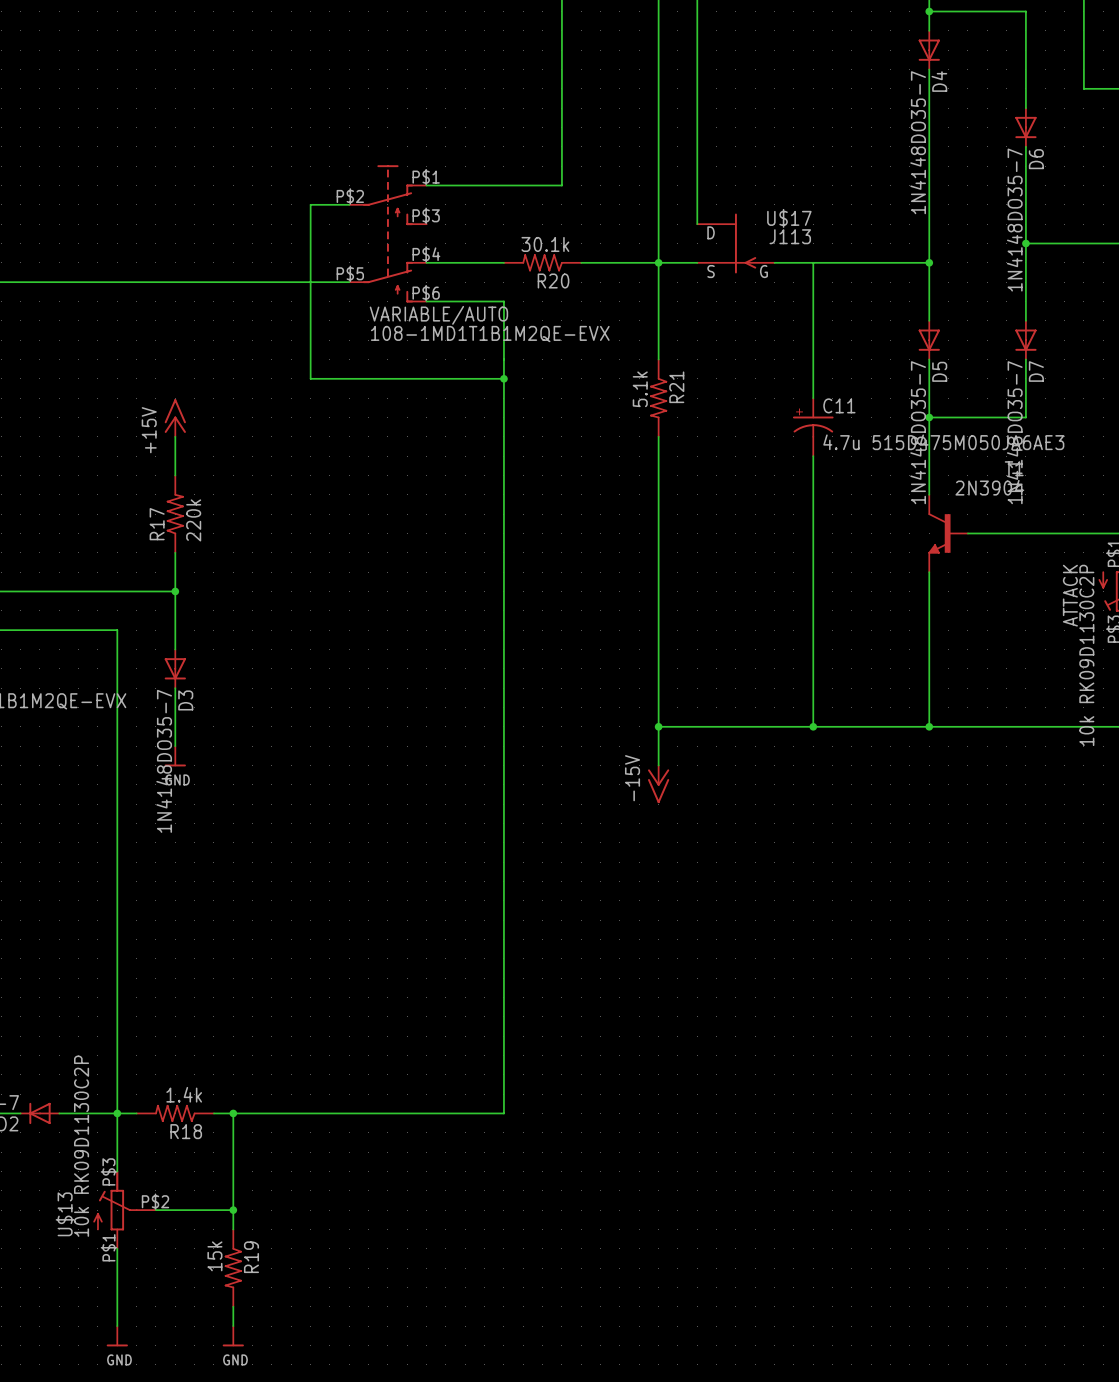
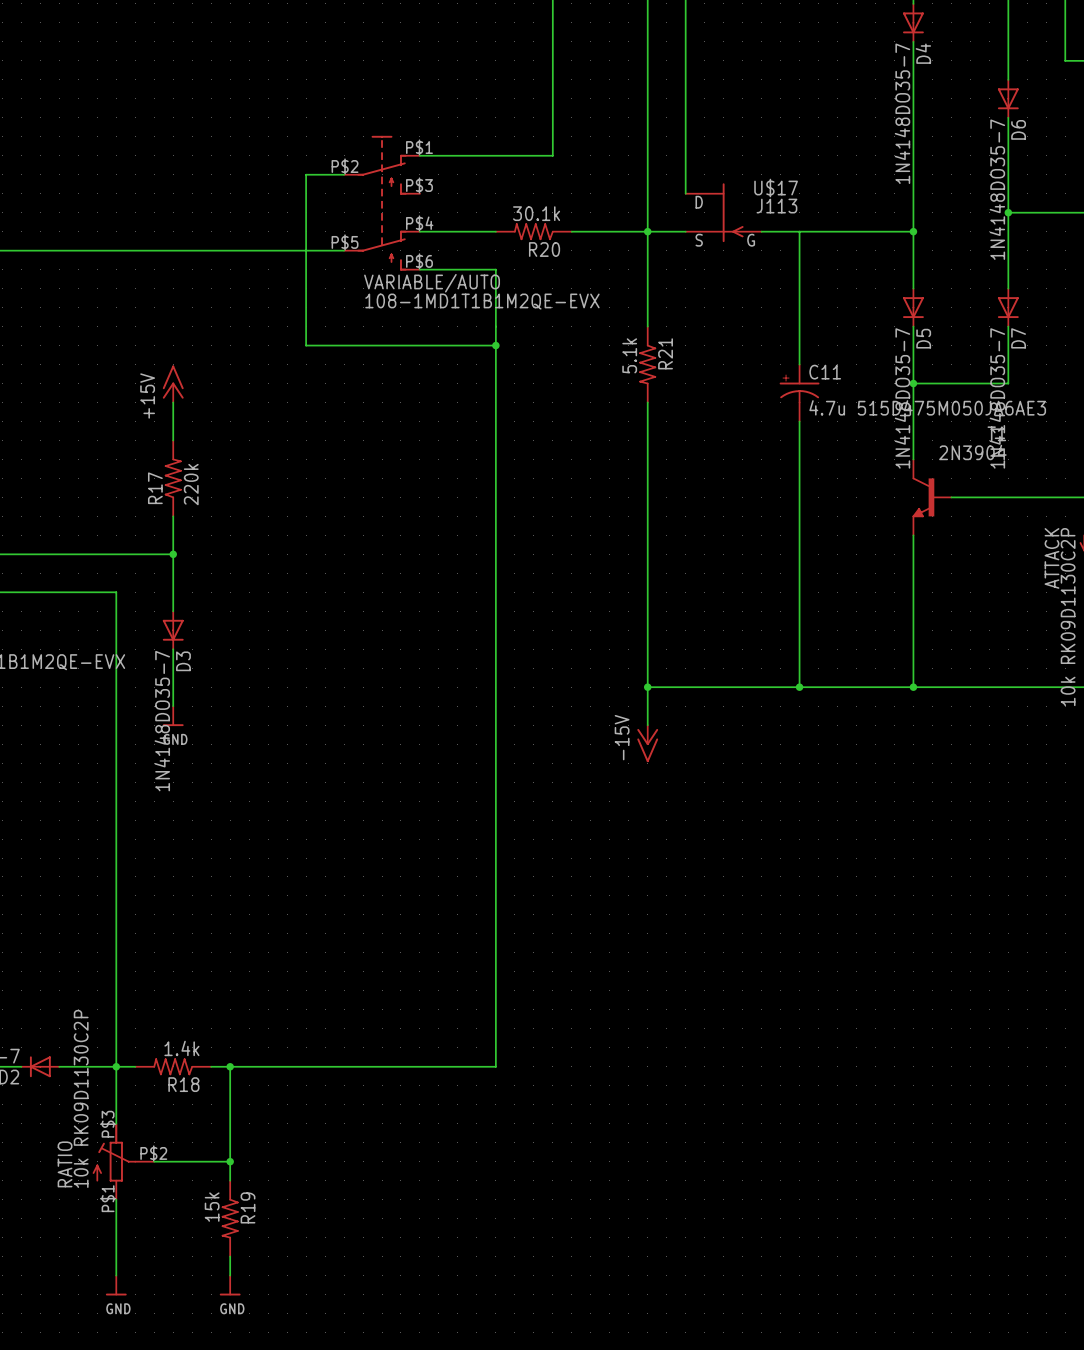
U$13 name: U$13 (65, 1214) -> RATIO (65, 1164)

